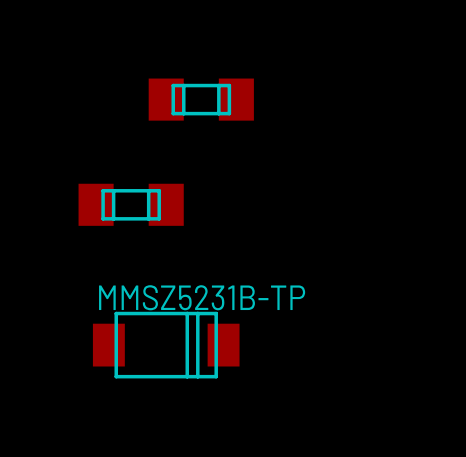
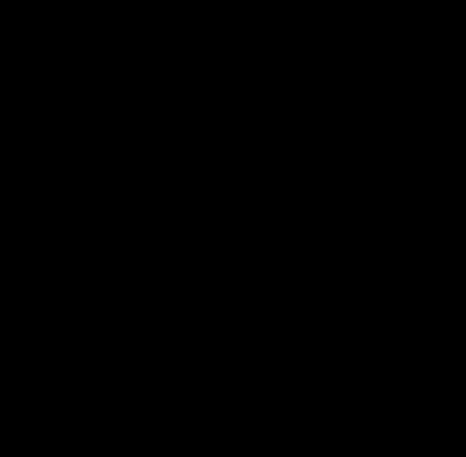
part: (201, 99) -> none
part: (131, 204) -> none
part: MMSZ5231B-TP (166, 345) -> none

